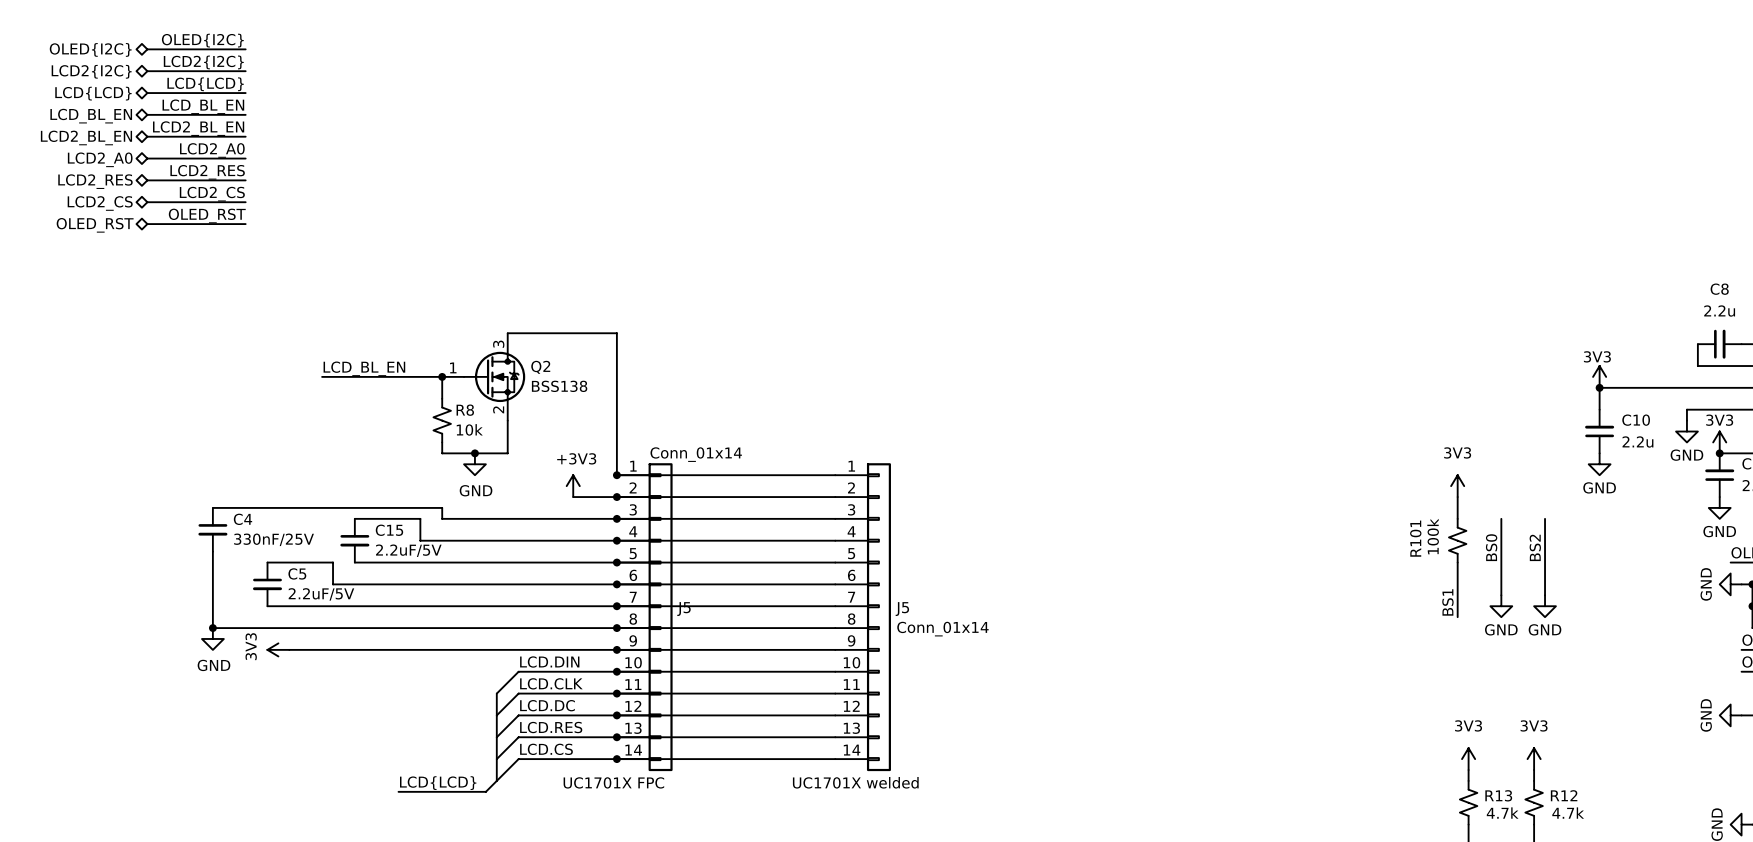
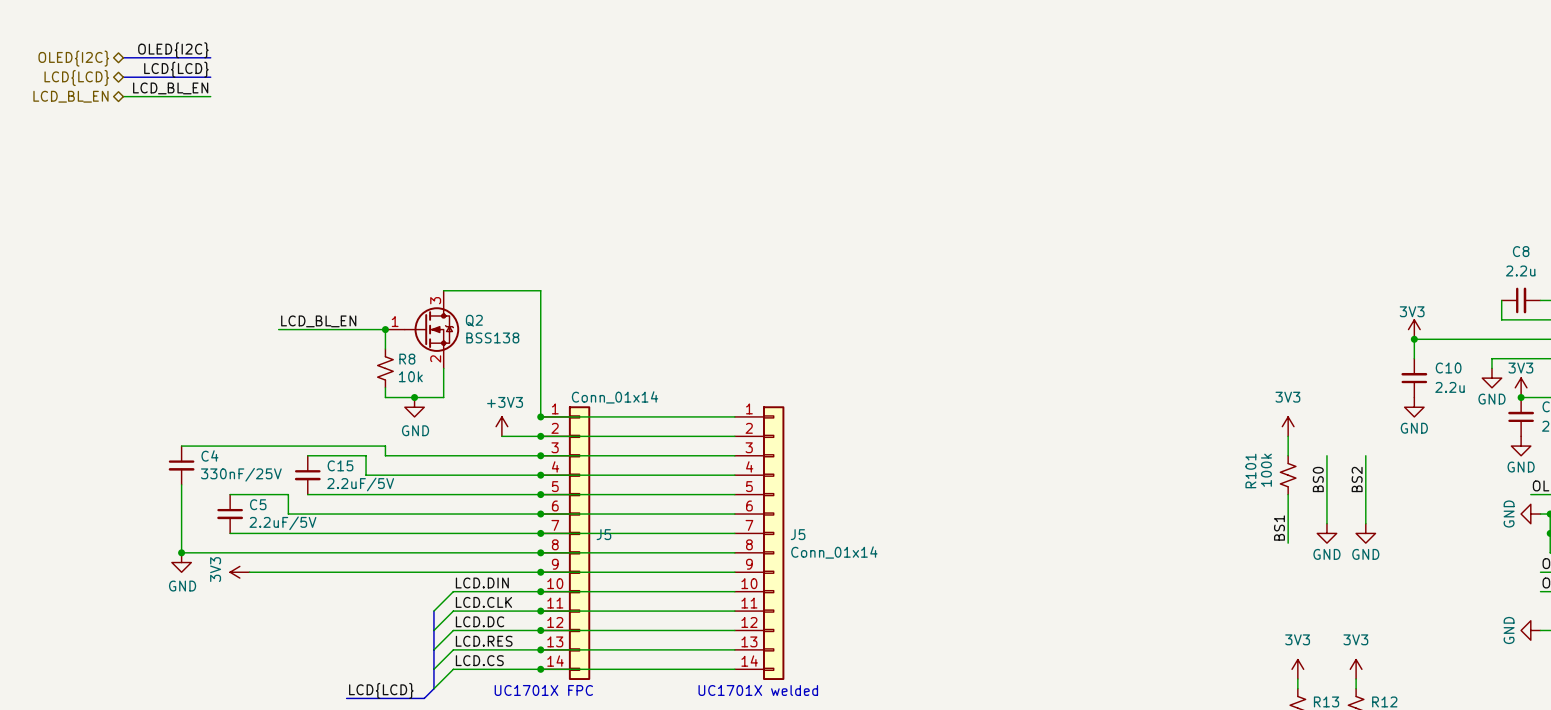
label: OLED{I2C} (202, 40) -> none
hierarchical label: OLED{I2C} (90, 49) -> none
bus: (147, 49) (245, 49) -> none
label: LCD2{I2C} (203, 62) -> OLED{I2C} (173, 50)
hierarchical label: LCD2{I2C} (91, 71) -> OLED{I2C} (73, 58)
label: LCD2_BL_EN (198, 128) -> none
wire: (147, 136) (245, 136) -> none
hierarchical label: LCD2_BL_EN (86, 137) -> none
label: LCD2_A0 (212, 150) -> none
wire: (147, 158) (245, 158) -> none
hierarchical label: LCD2_A0 (100, 159) -> none
label: LCD2_RES (207, 172) -> none
wire: (147, 180) (245, 180) -> none
hierarchical label: LCD2_RES (95, 181) -> none
label: LCD2_CS (212, 194) -> none
wire: (147, 202) (245, 202) -> none
hierarchical label: LCD2_CS (100, 203) -> none
label: OLED_RST (207, 215) -> none
wire: (147, 224) (245, 224) -> none
hierarchical label: OLED_RST (95, 225) -> none

